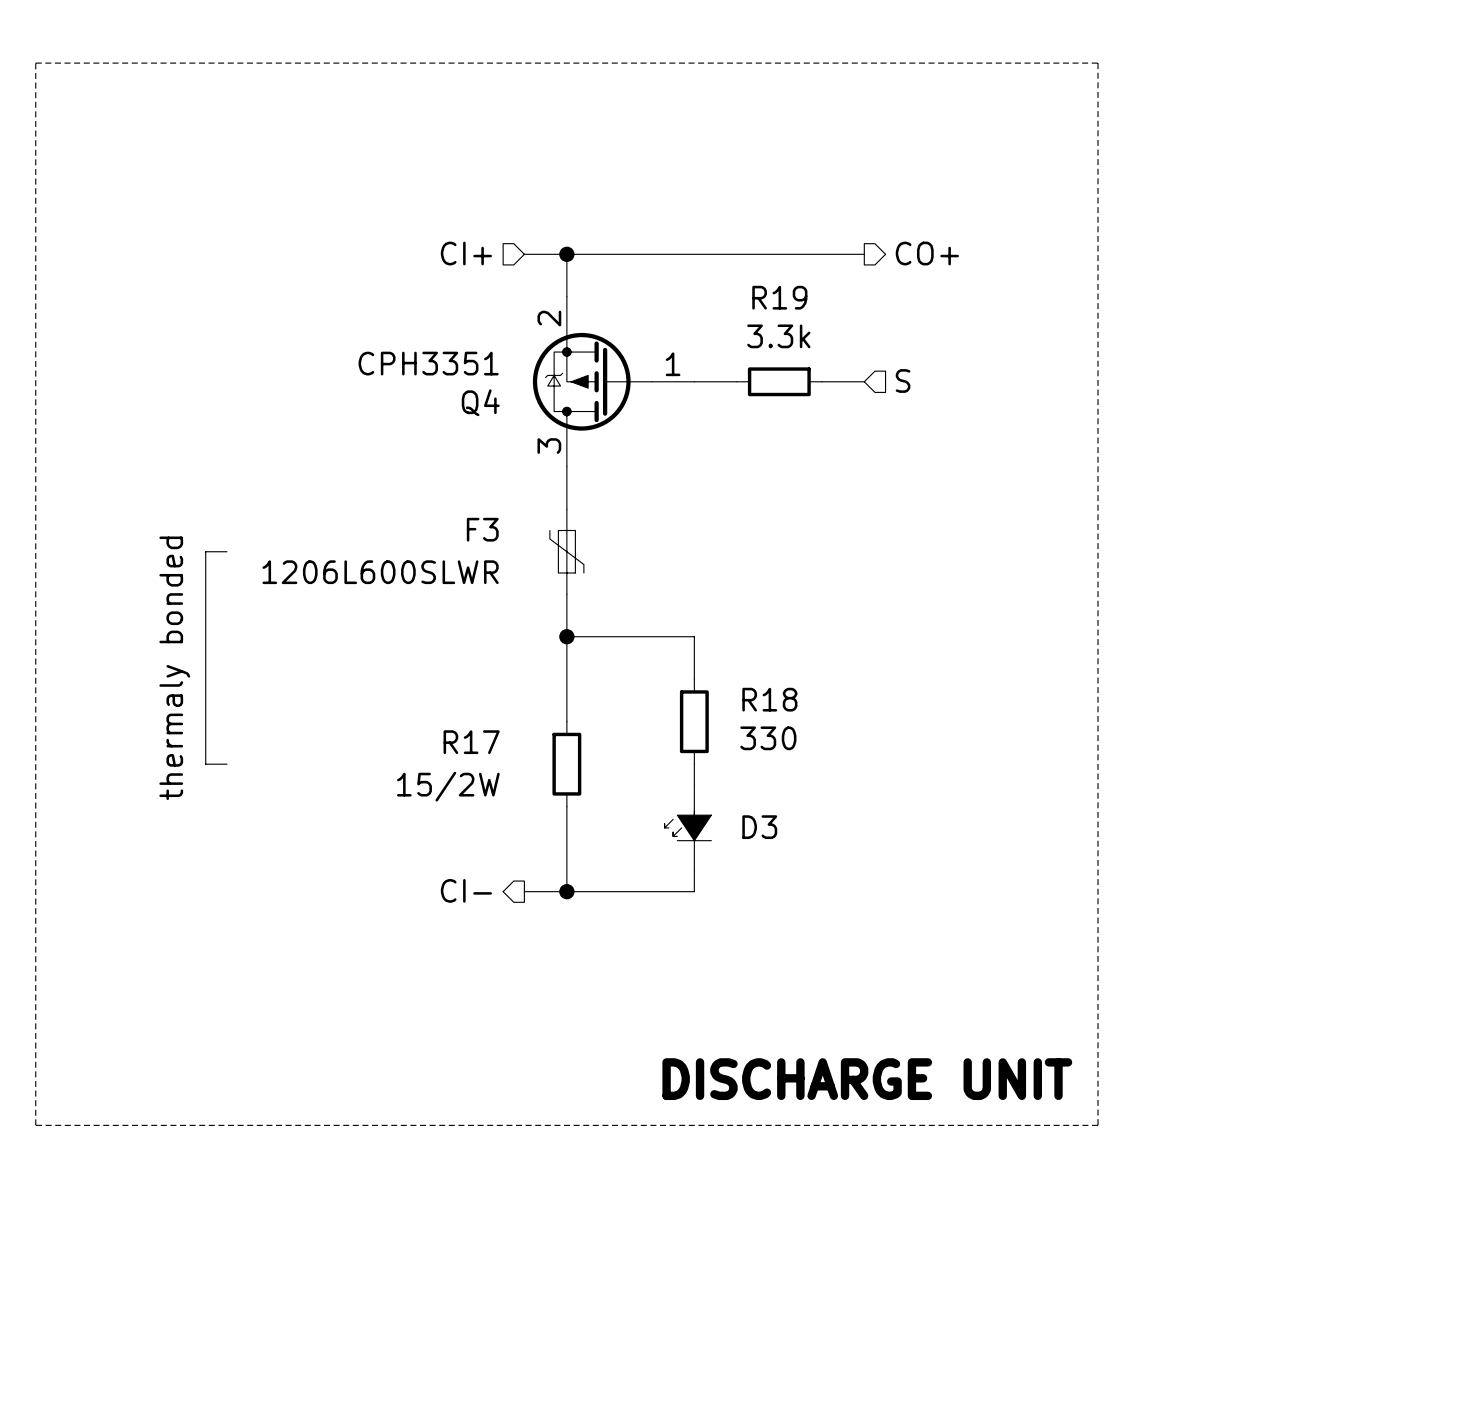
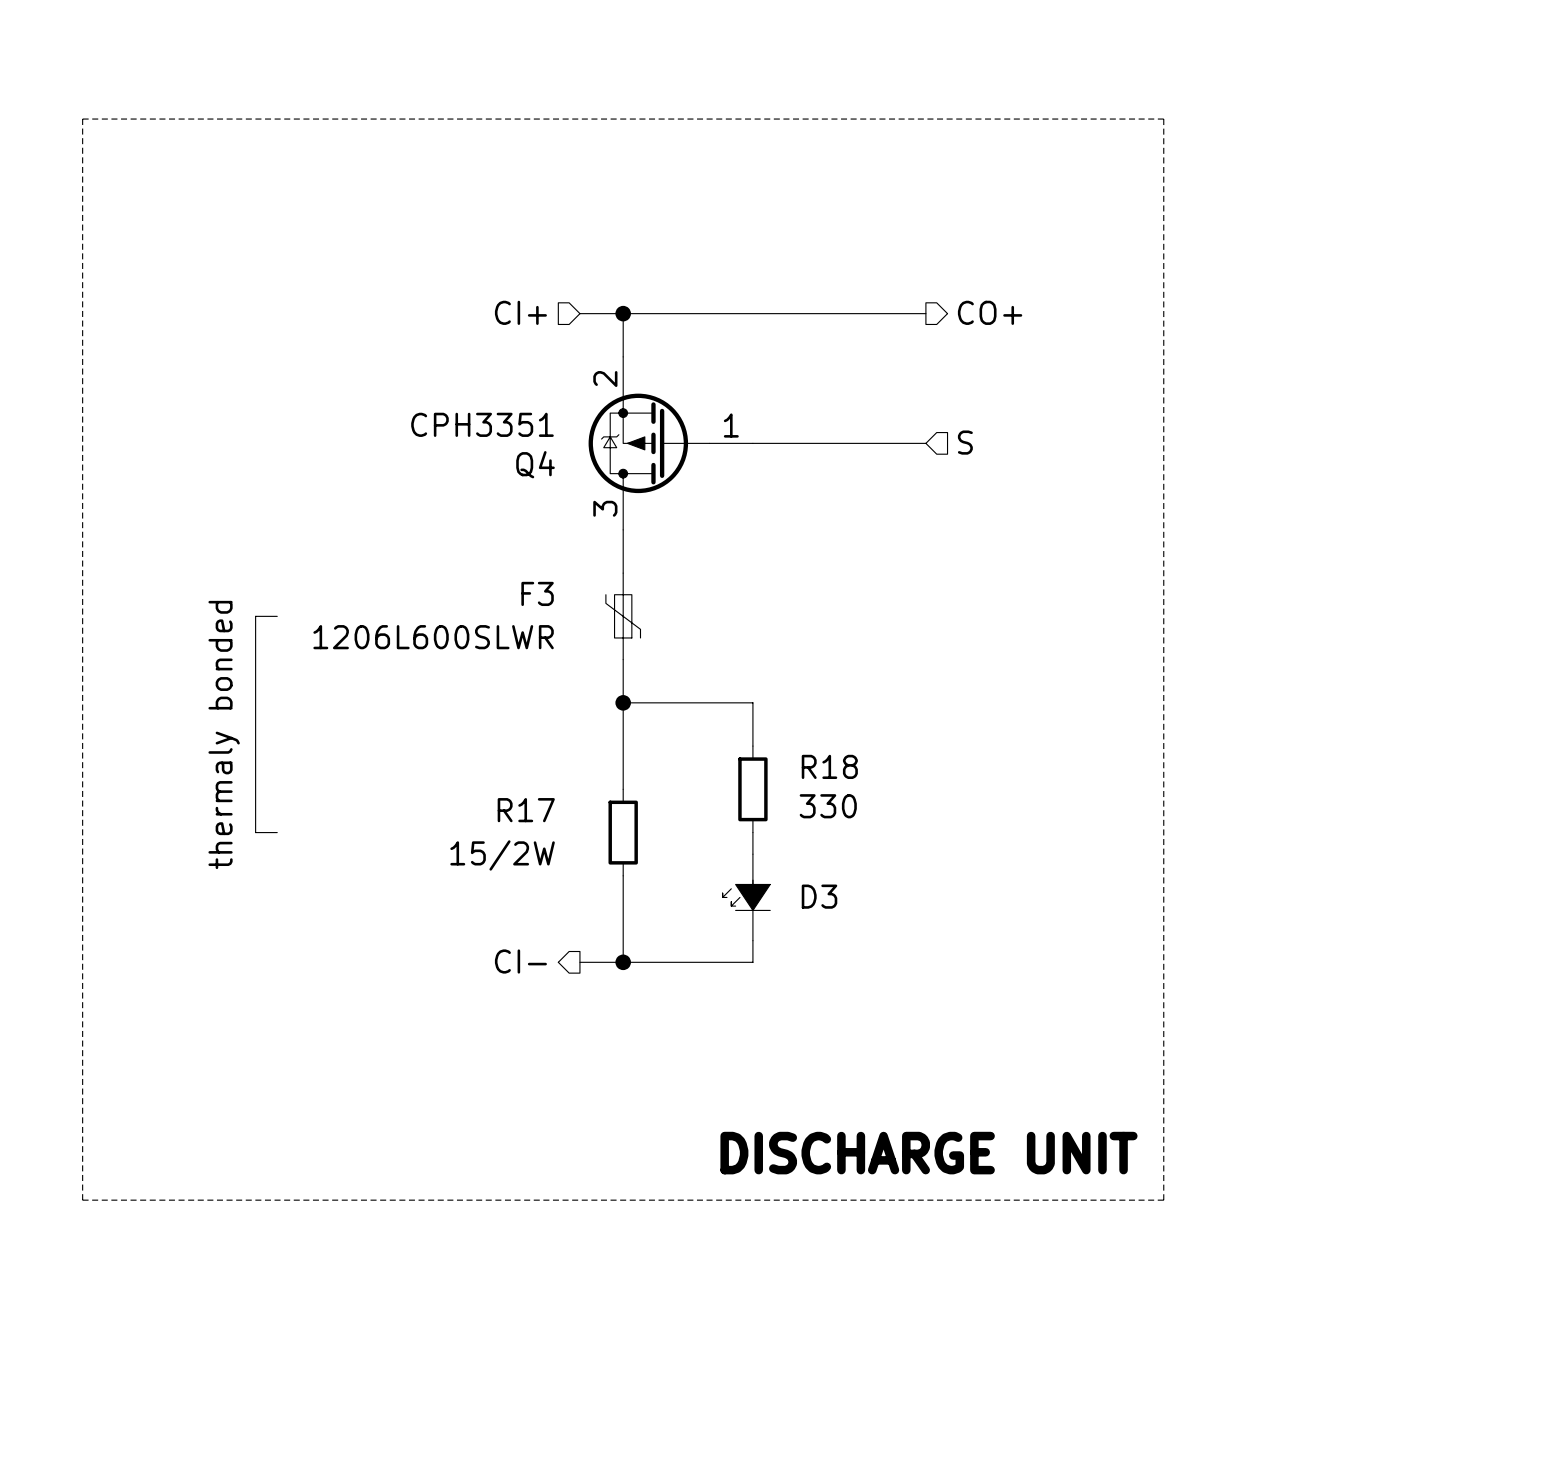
wire: none -> (796, 443) (882, 443)
R19: 3.3k (779, 381) -> none

